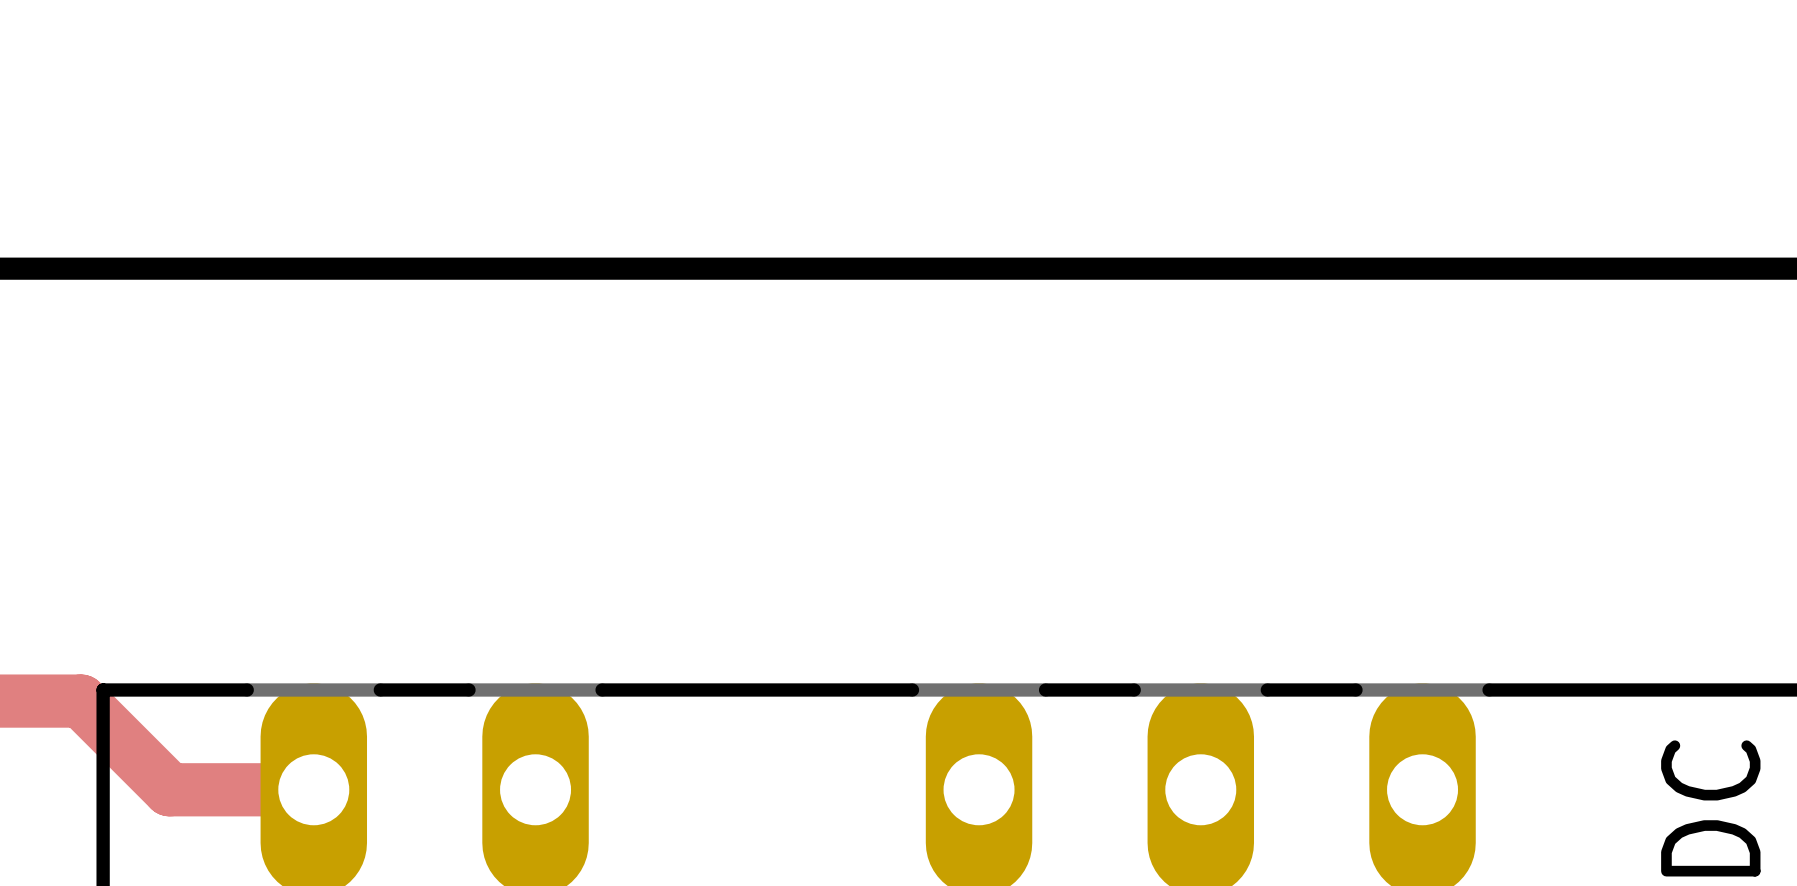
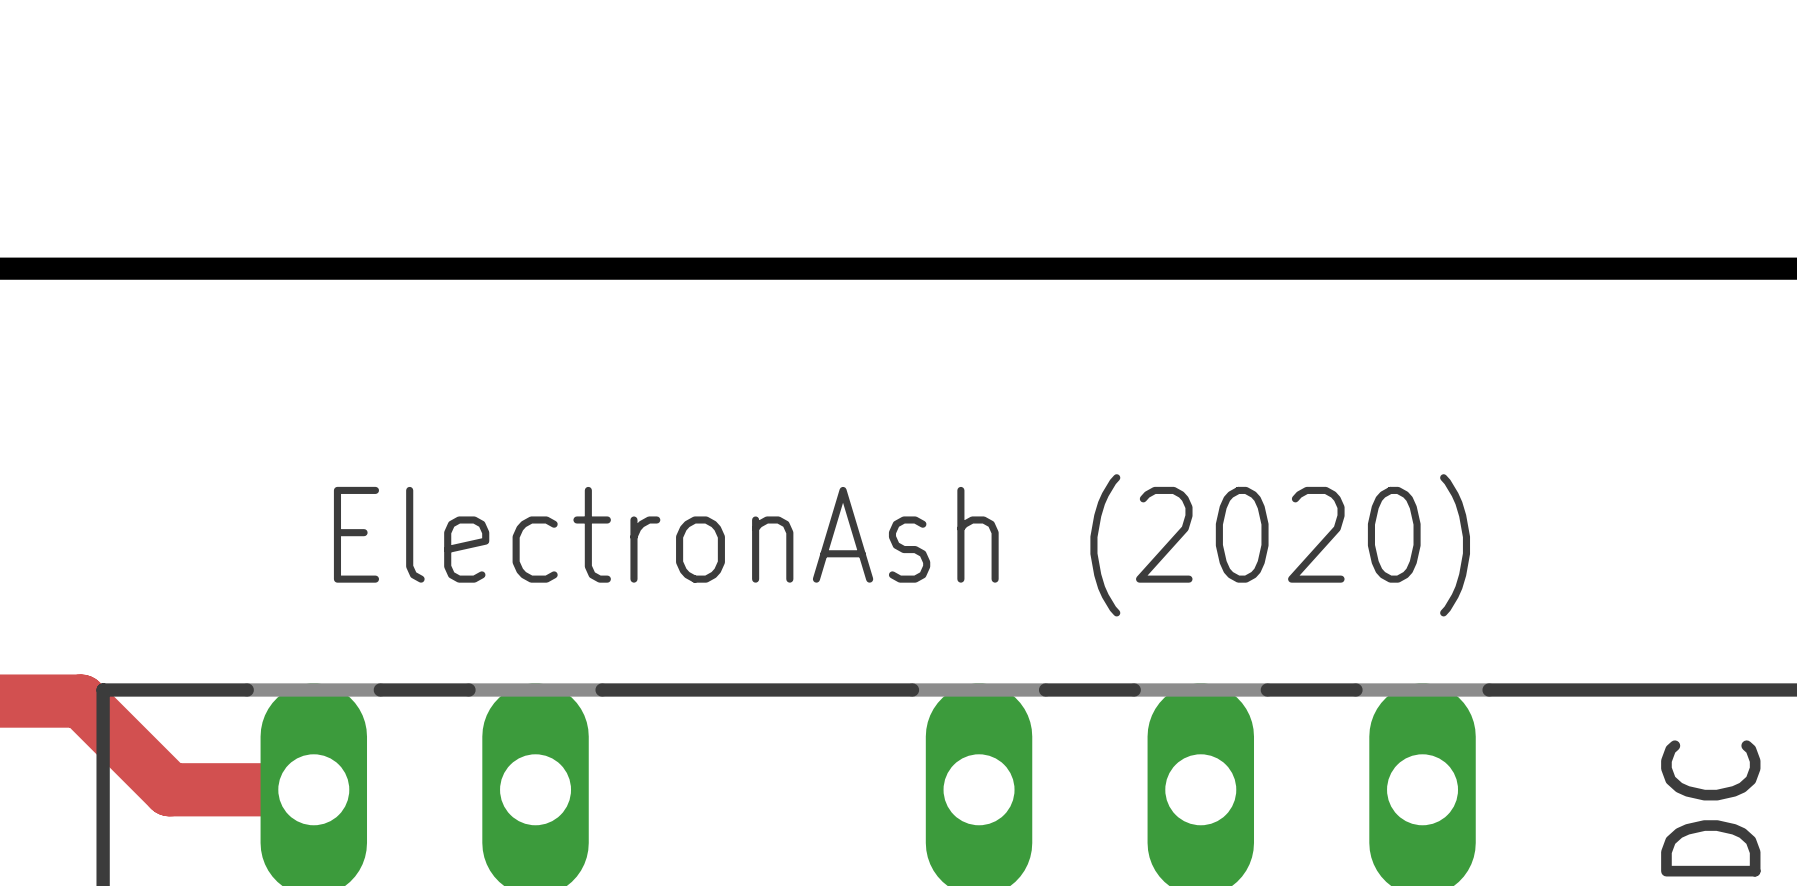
text: none -> ElectronAsh (2020) (901, 545)

